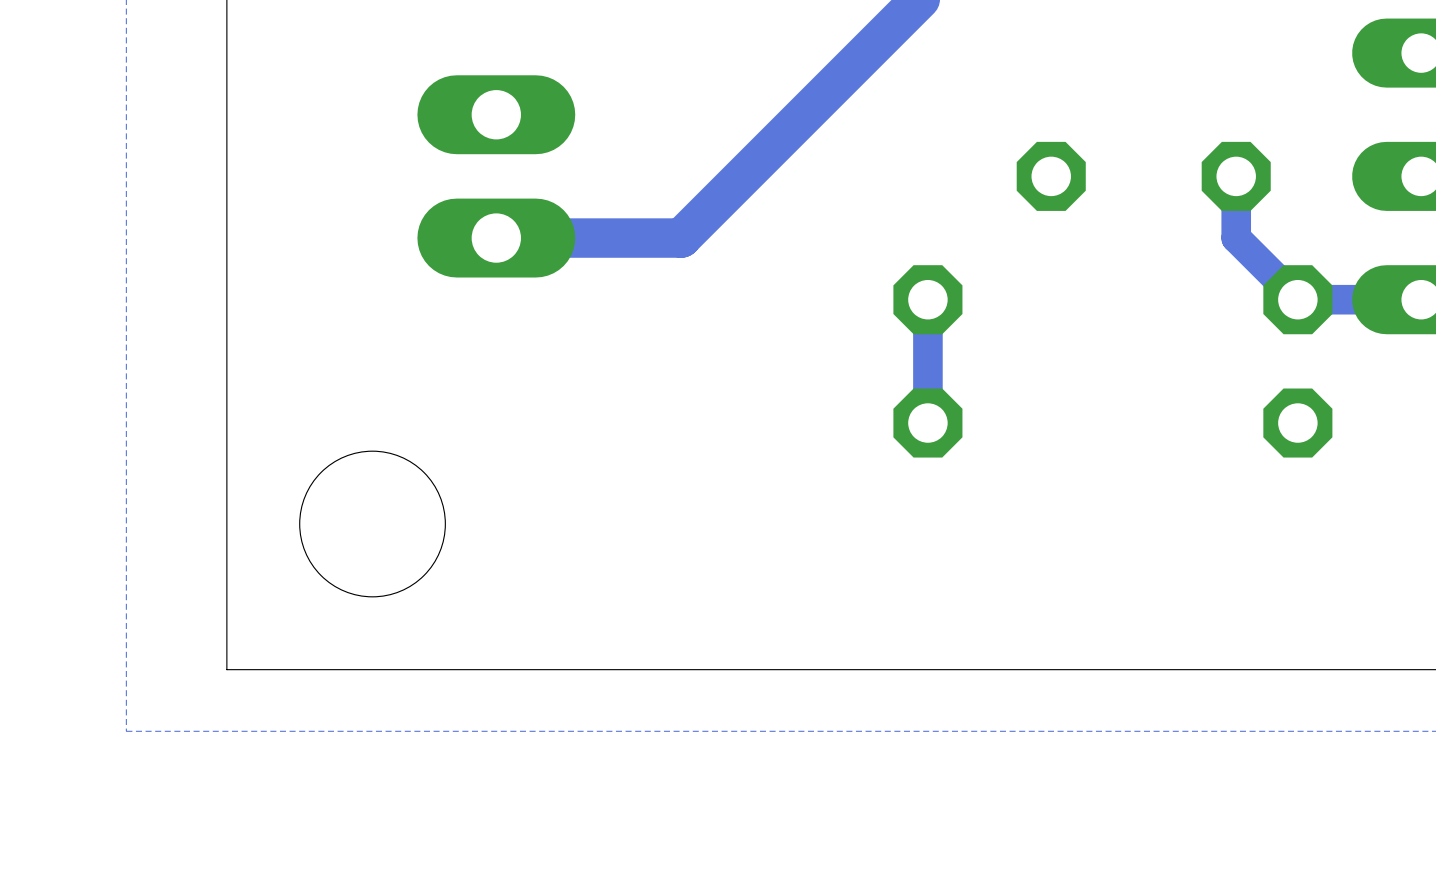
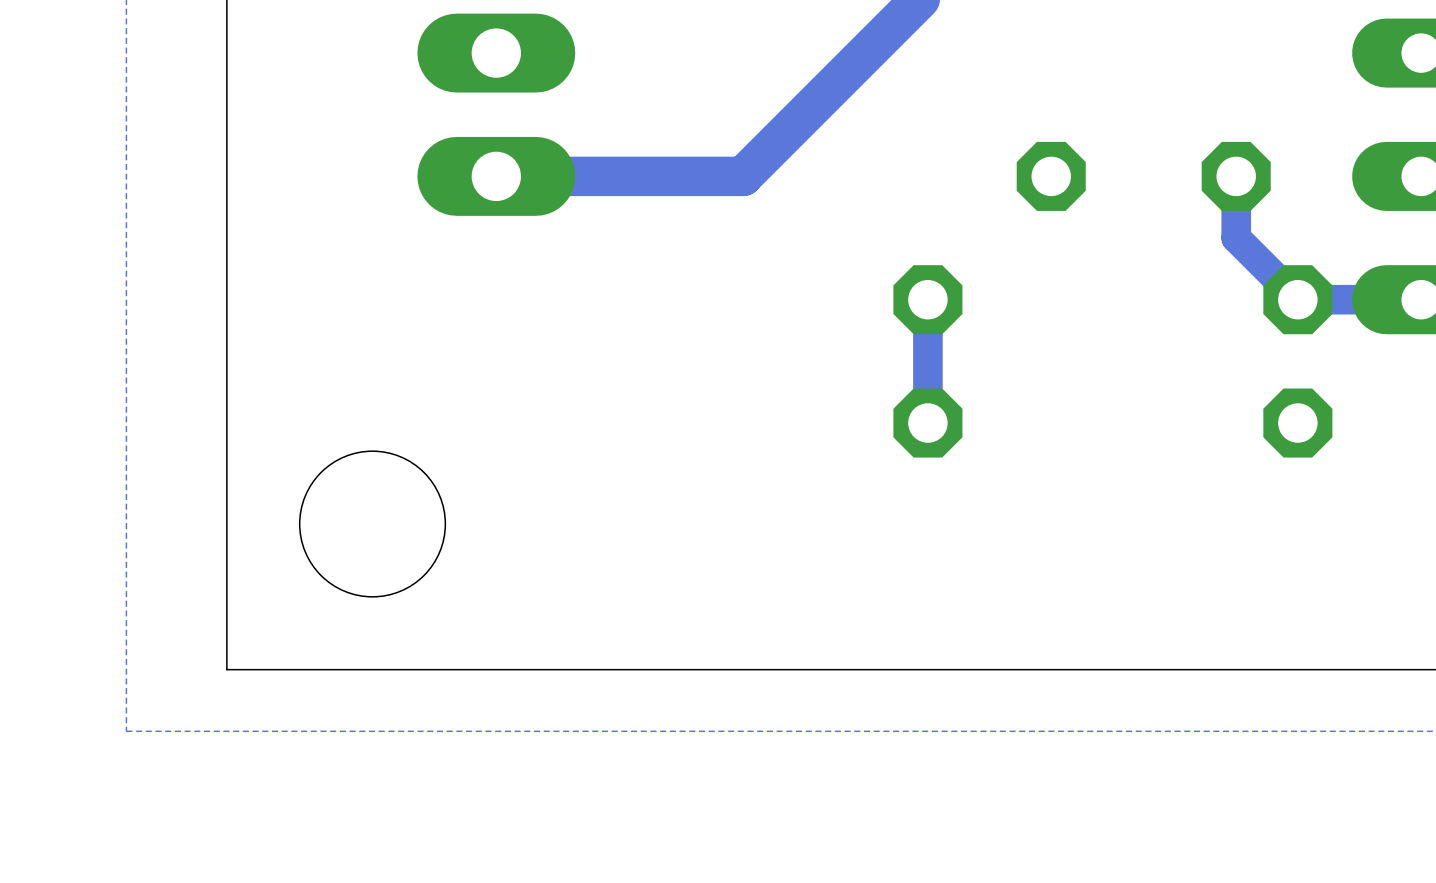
part position: (496, 176) -> (496, 114)
track: (742, 176) (681, 238) (496, 238) -> (742, 176) (496, 176)

